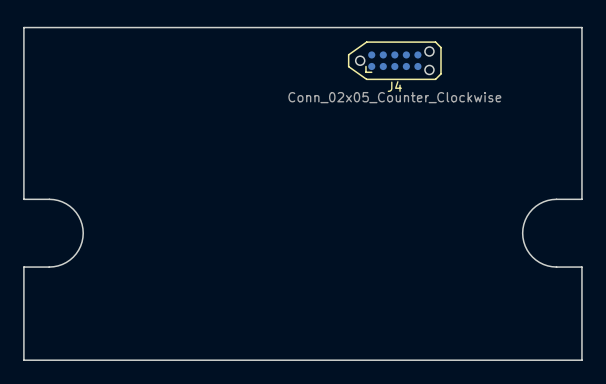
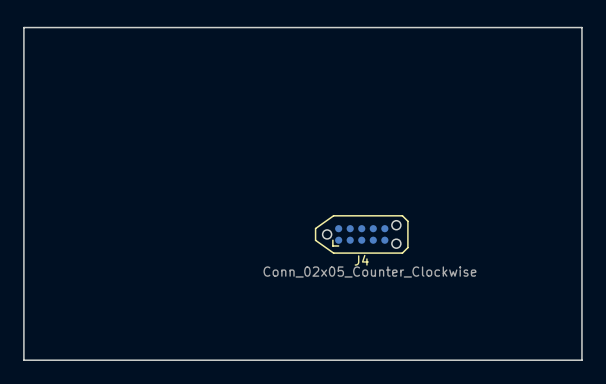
J4 position: (394, 60) -> (361, 234)
J4 value position: Conn_02x05_Counter_Clockwise (394, 97) -> Conn_02x05_Counter_Clockwise (369, 271)
board edge: (23, 199) (53, 199) (66, 203) (78, 216) (83, 233) (78, 250) (66, 262) (53, 266) (23, 267) -> (23, 199) (23, 267)
board edge: (581, 199) (552, 199) (539, 203) (527, 216) (522, 233) (527, 250) (539, 262) (552, 266) (581, 267) -> (581, 199) (581, 267)

